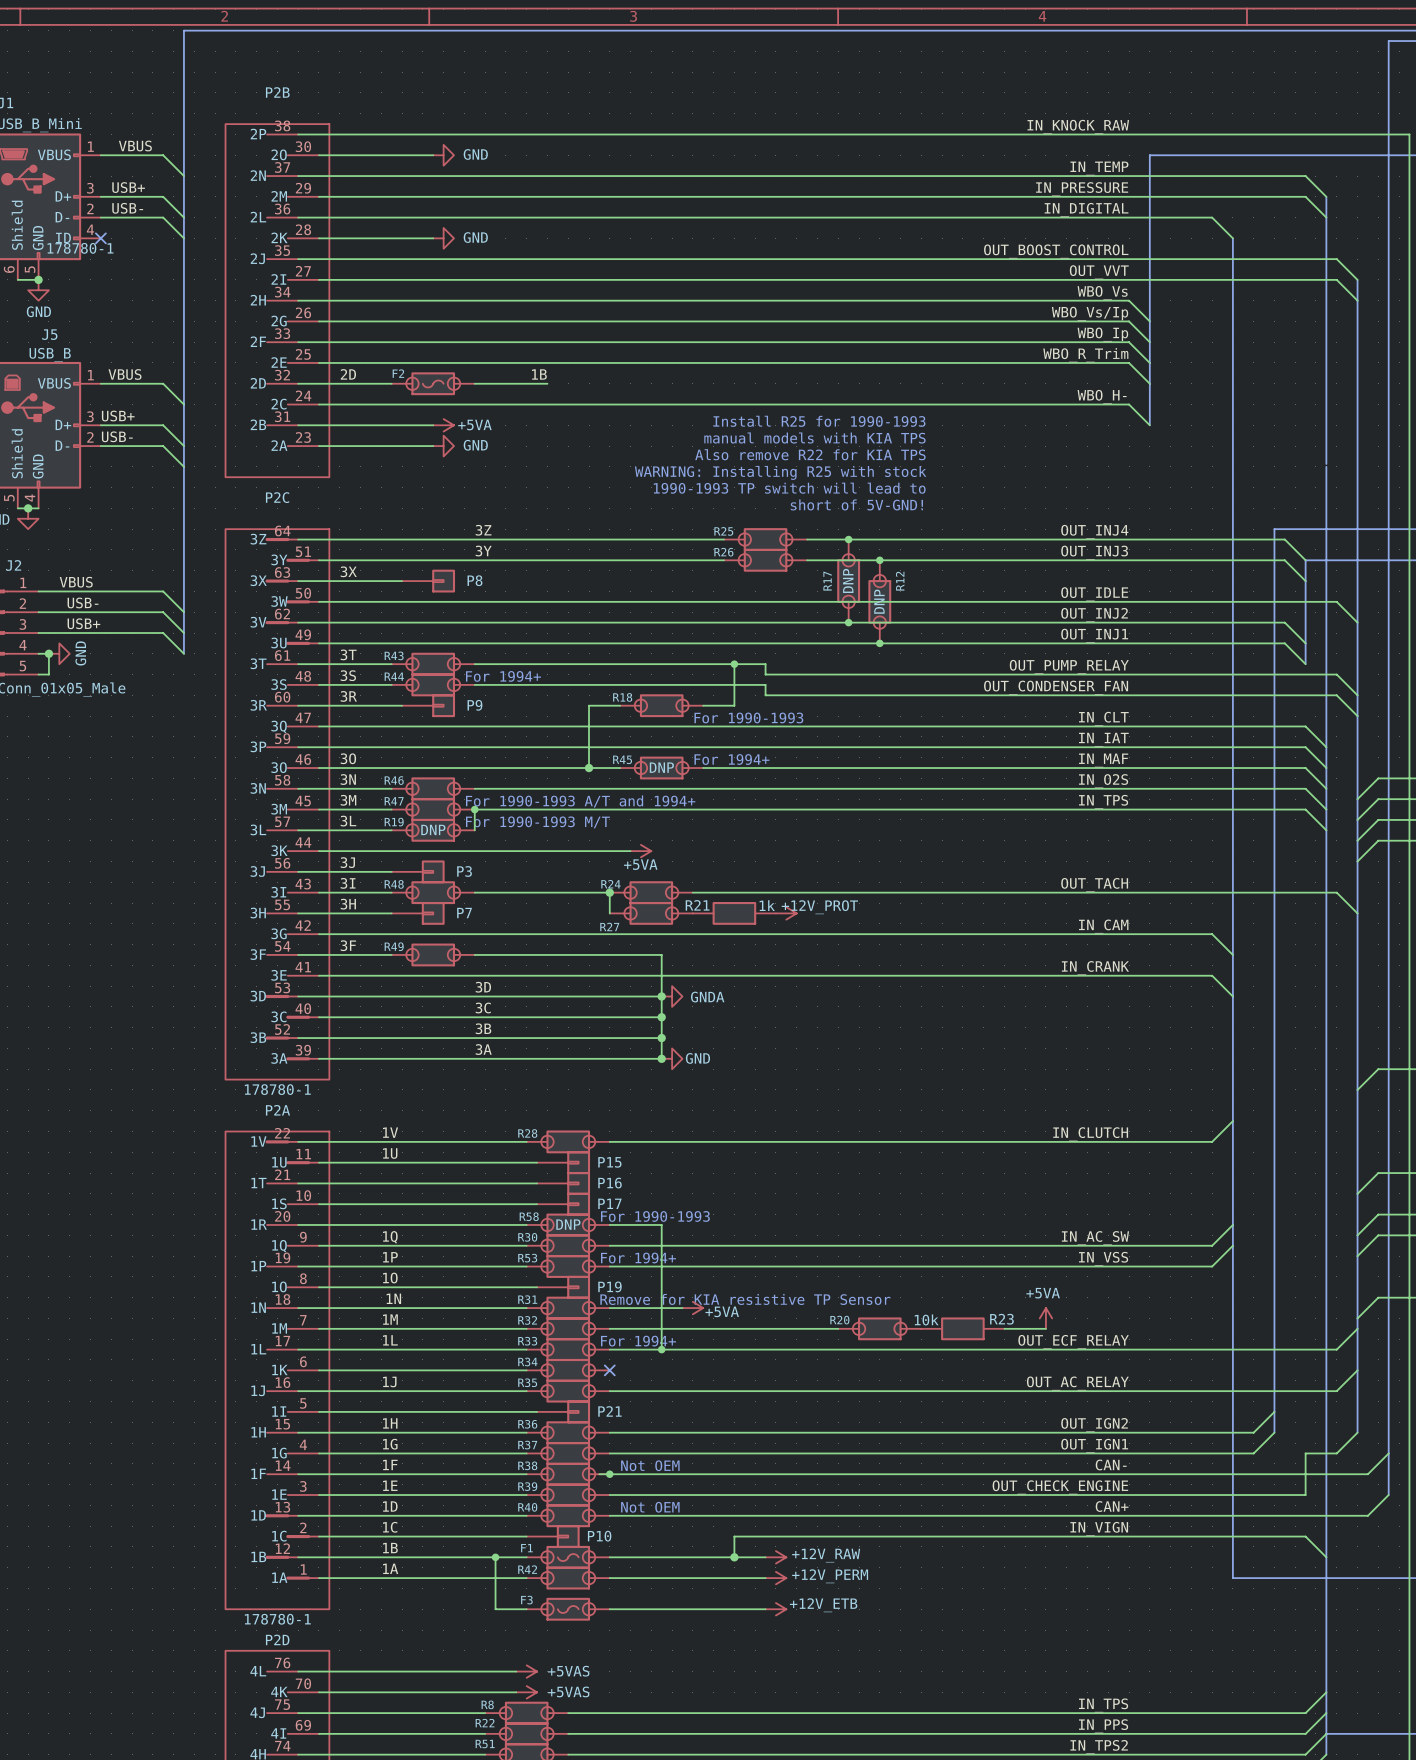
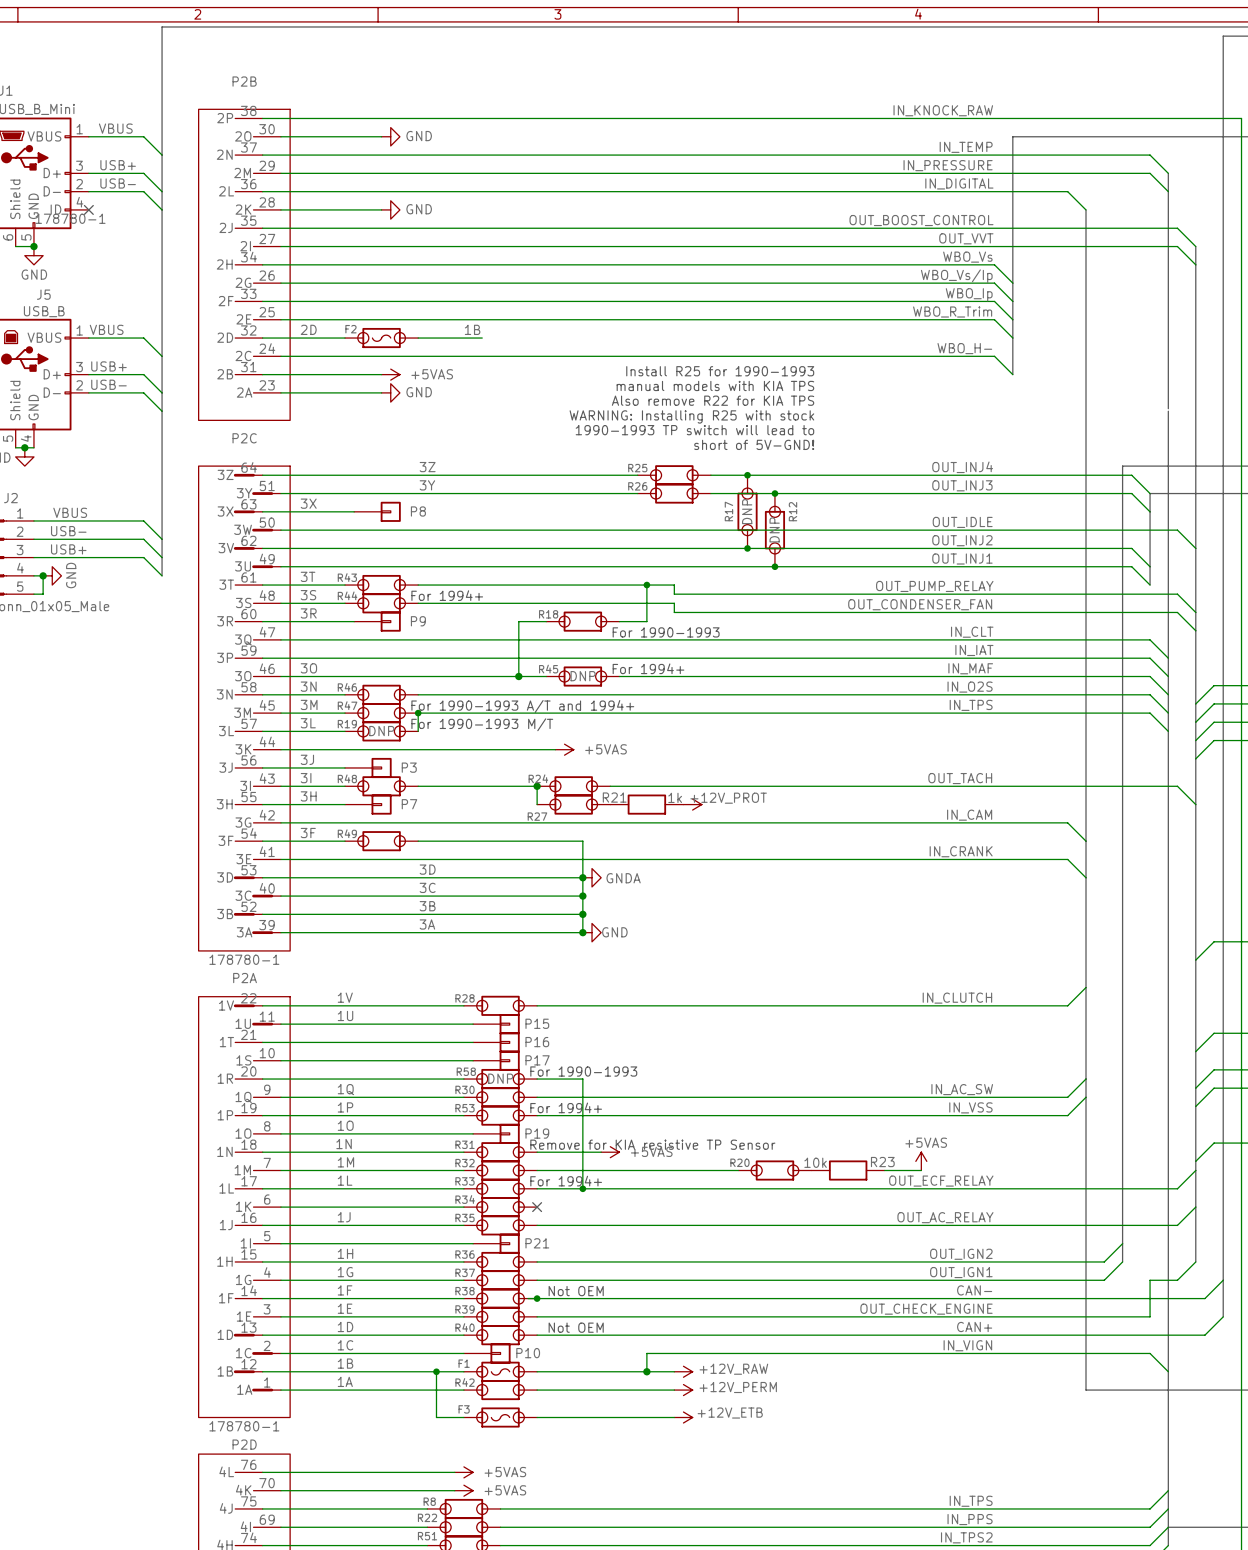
power symbol: +5VA (443, 425) -> +5VAS (390, 374)
power symbol: +5VA (640, 851) -> +5VAS (564, 749)
power symbol: +5VA (692, 1308) -> +5VAS (610, 1152)
power symbol: +5VA (1045, 1318) -> +5VAS (921, 1161)

